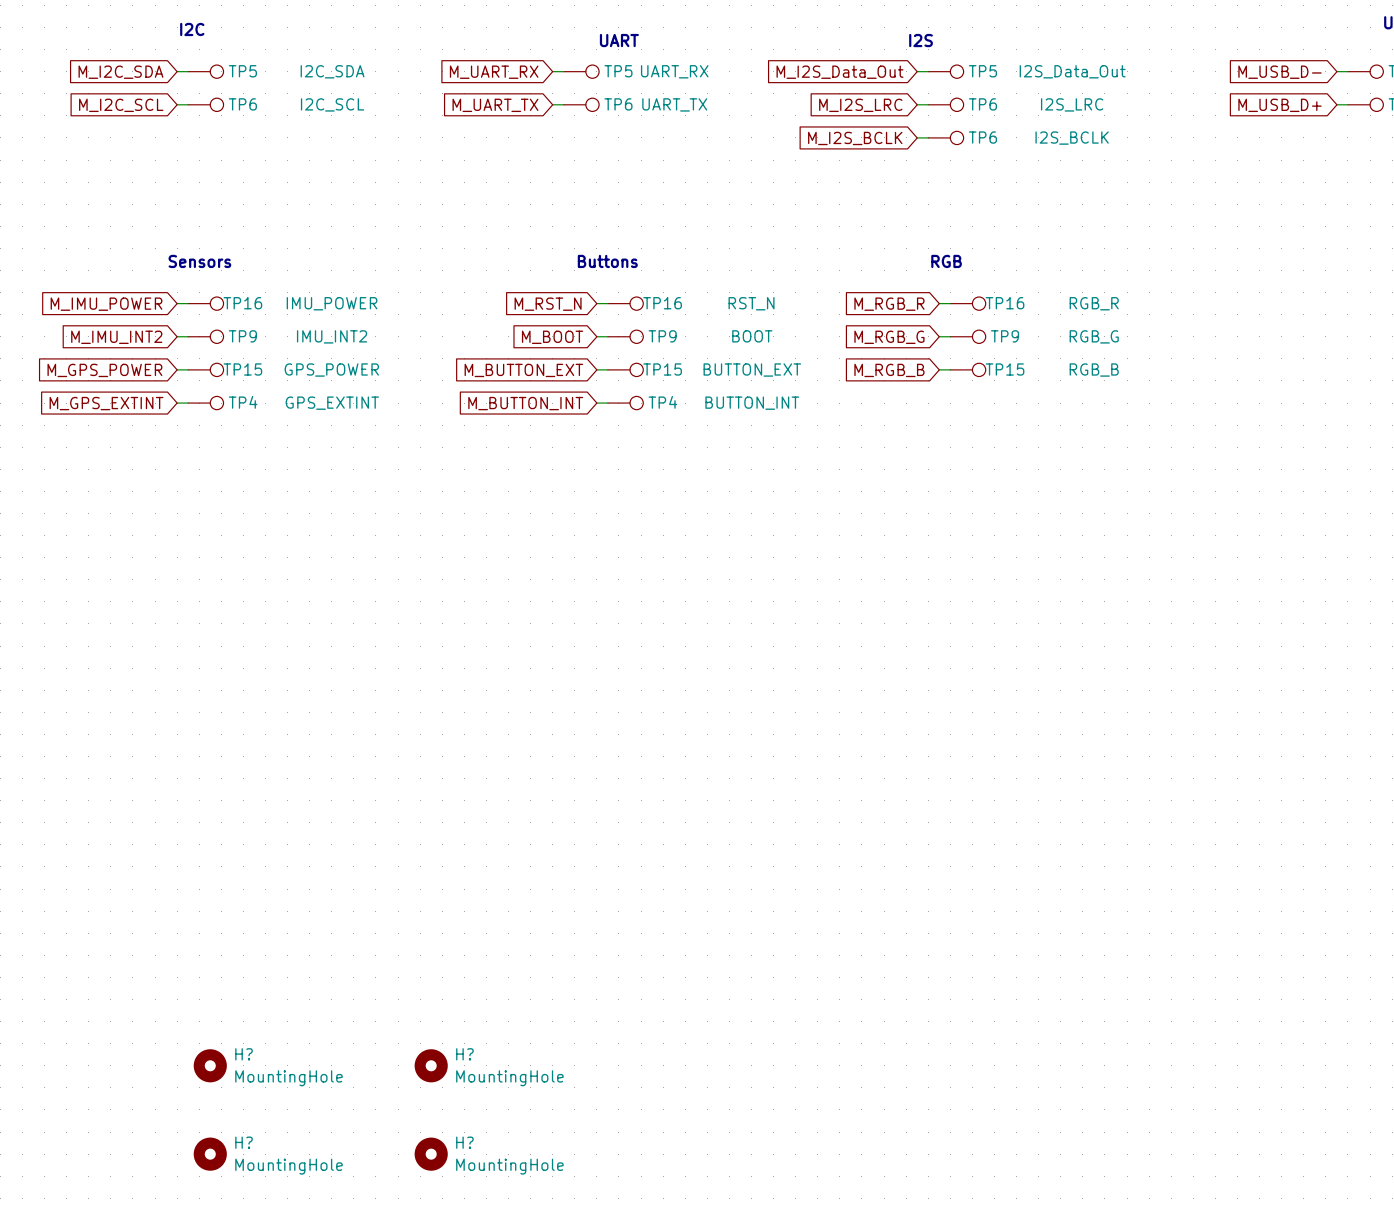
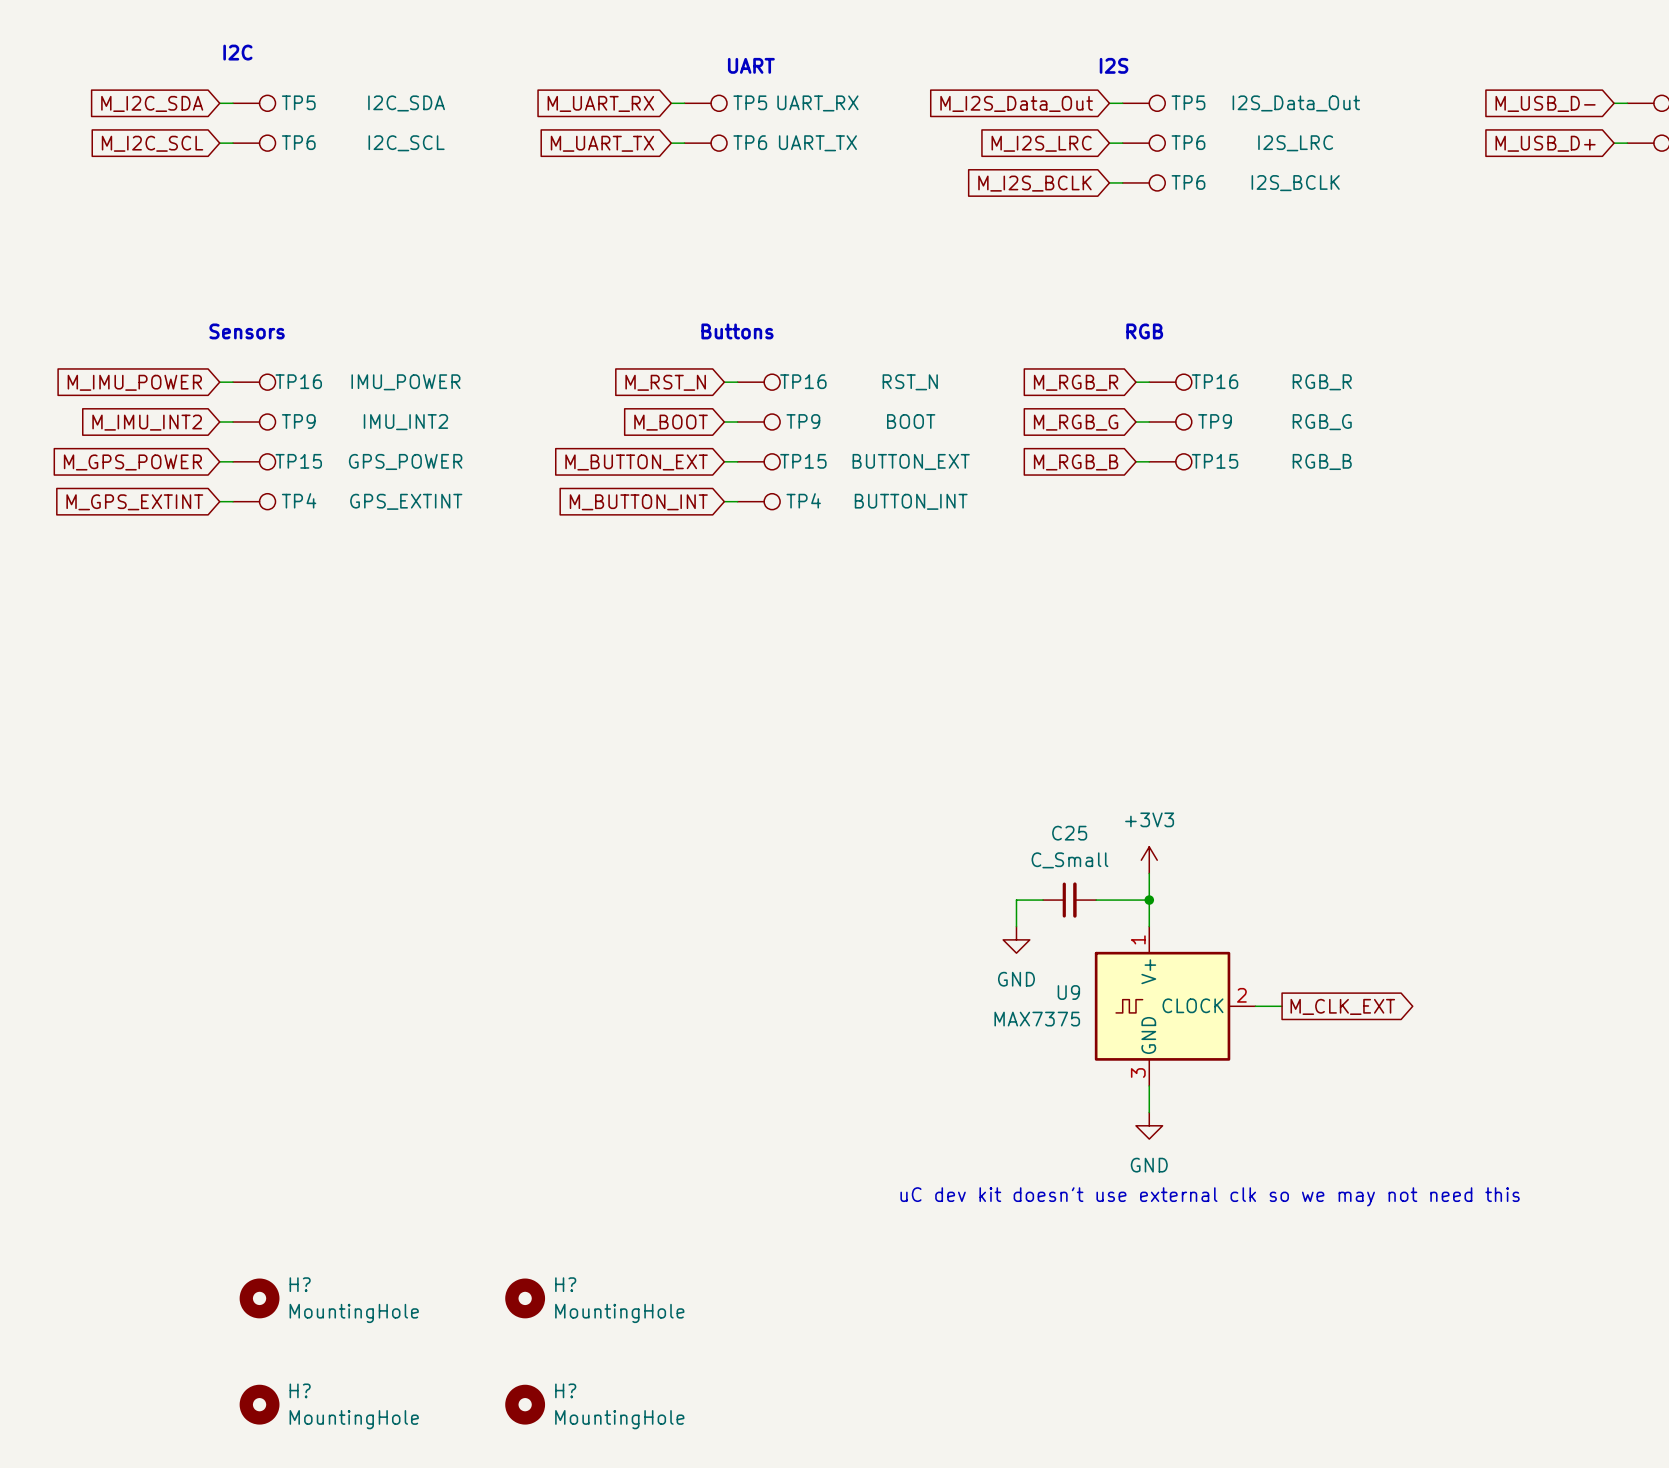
power symbol: none -> +3V3 (1149, 860)
wire: none -> (1149, 873) (1149, 926)
wire: none -> (1043, 900) (1016, 900) (1016, 926)
C25: none -> C_Small (1069, 900)
wire: none -> (1096, 900) (1149, 900)
junction: none -> (1149, 900)
power symbol: none -> GND (1016, 939)
U9: none -> MAX7375 (1175, 1006)
wire: none -> (1255, 1006) (1282, 1006)
global label: none -> M_CLK_EXT (1342, 1006)
wire: none -> (1149, 1085) (1149, 1112)
power symbol: none -> GND (1149, 1125)
text: none -> uC dev kit doesn't use external clk so we may not need this (1210, 1196)

